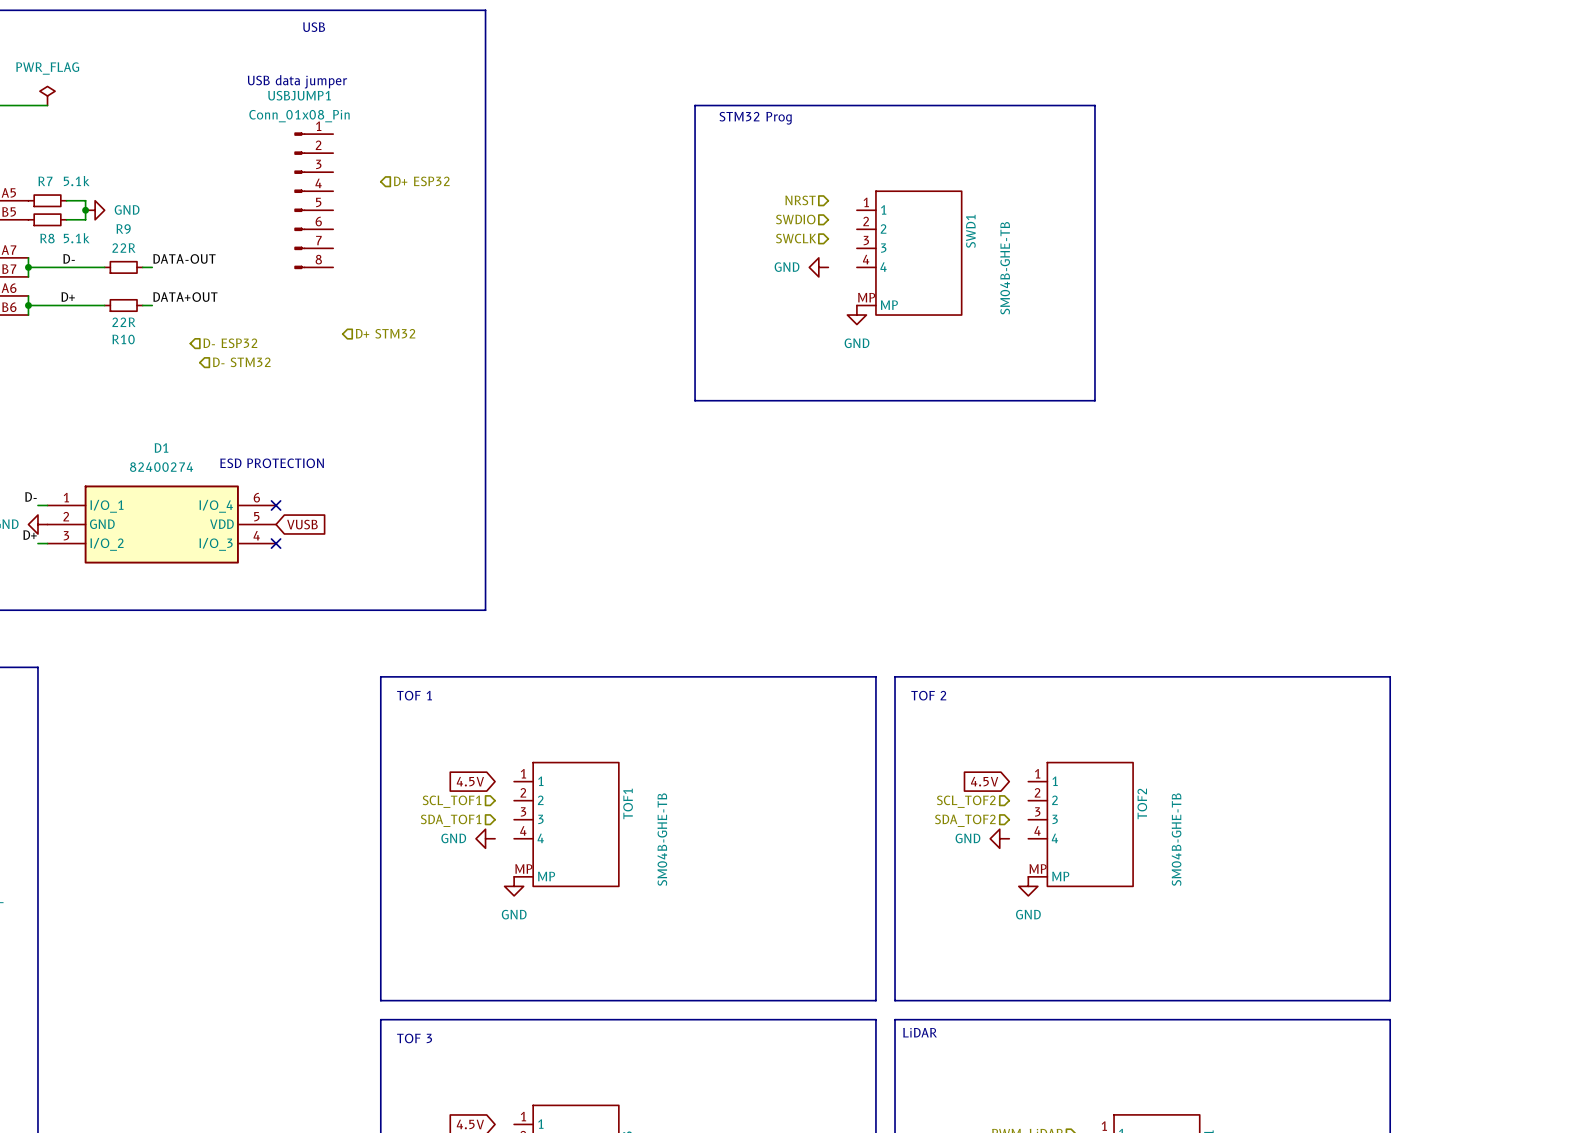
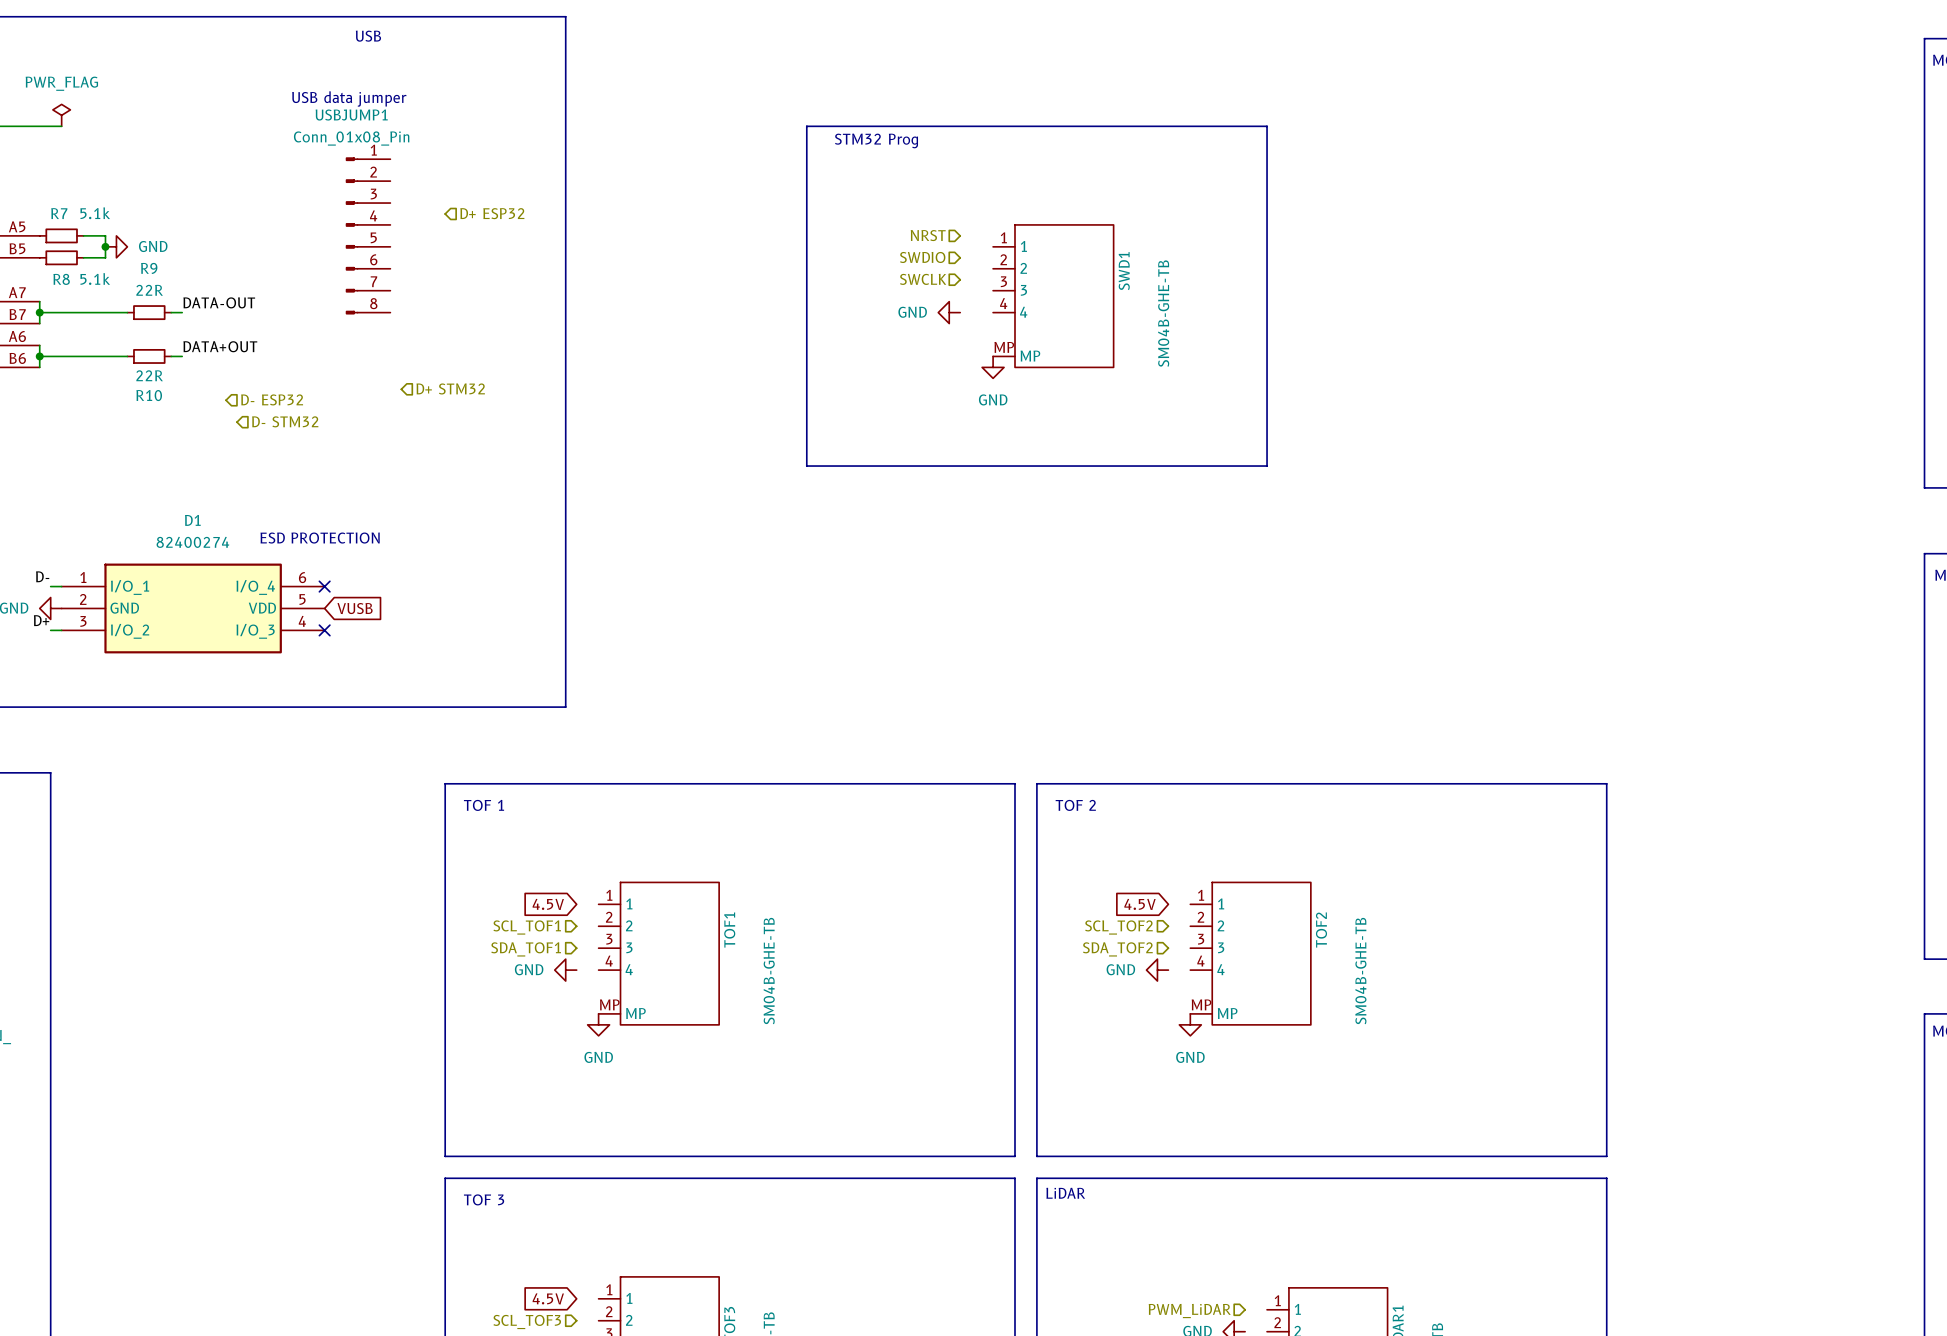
label: D- (69, 258) -> none
label: D+ (68, 297) -> none

